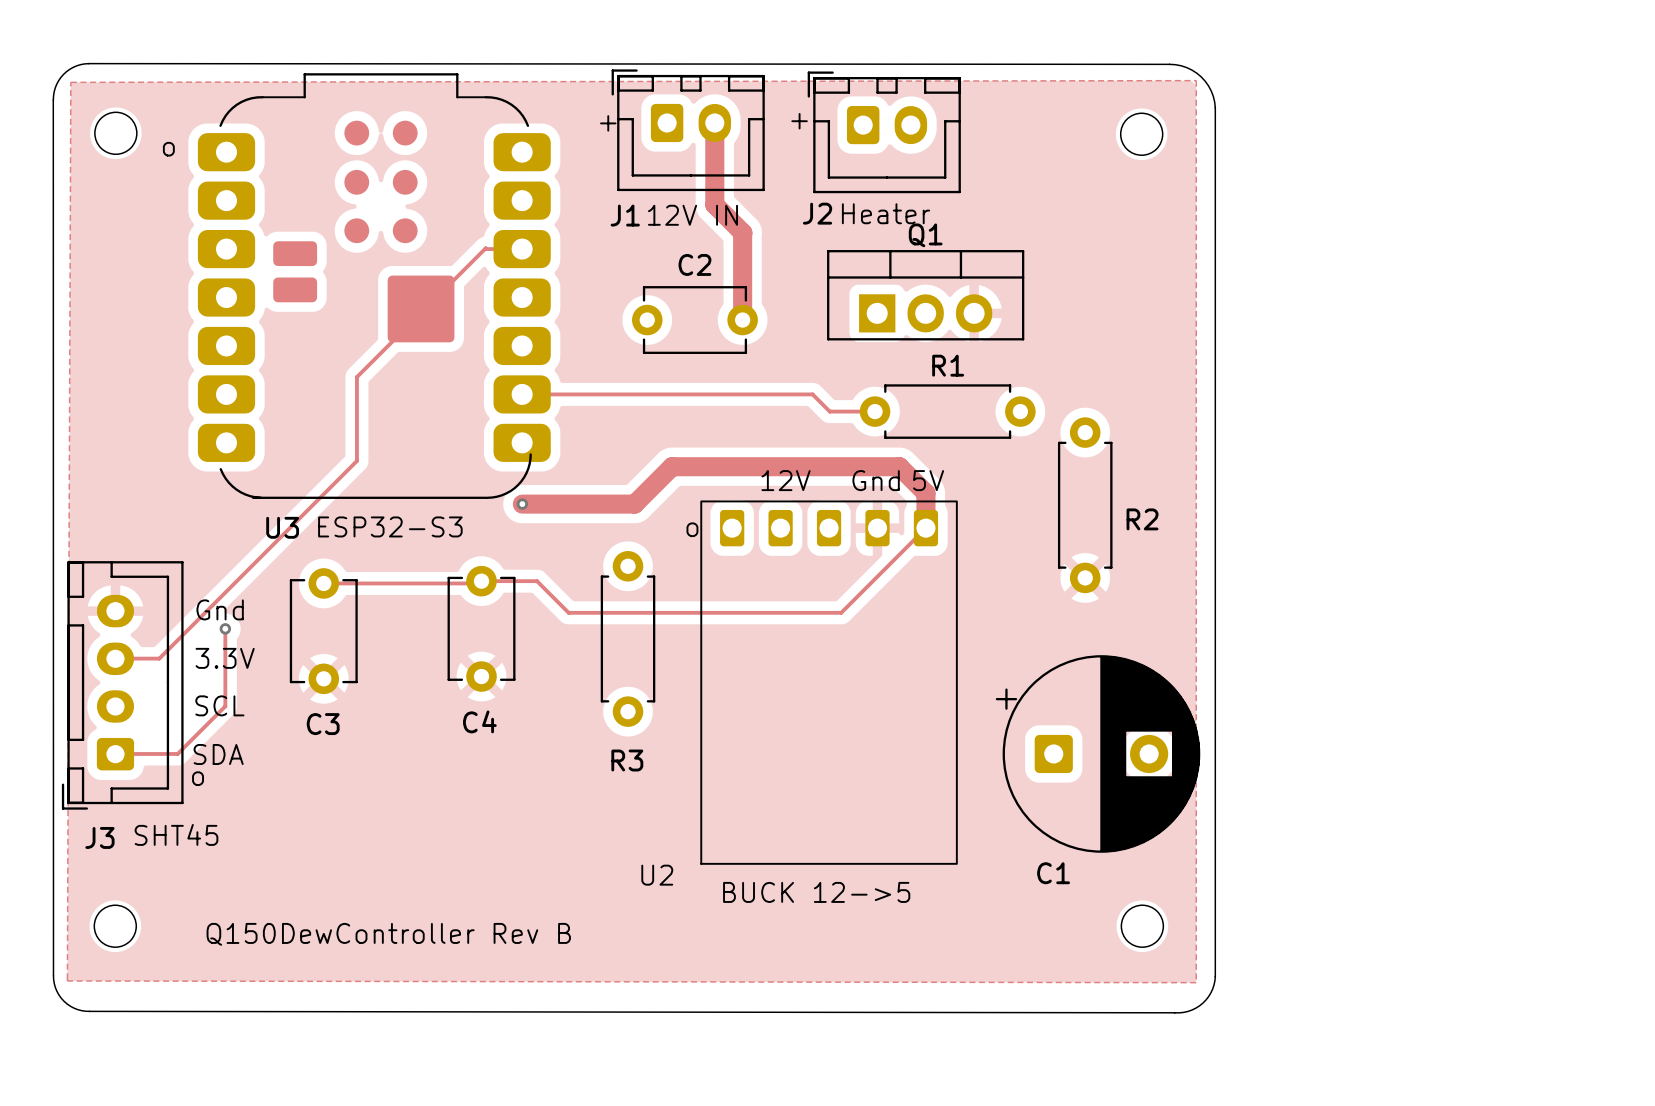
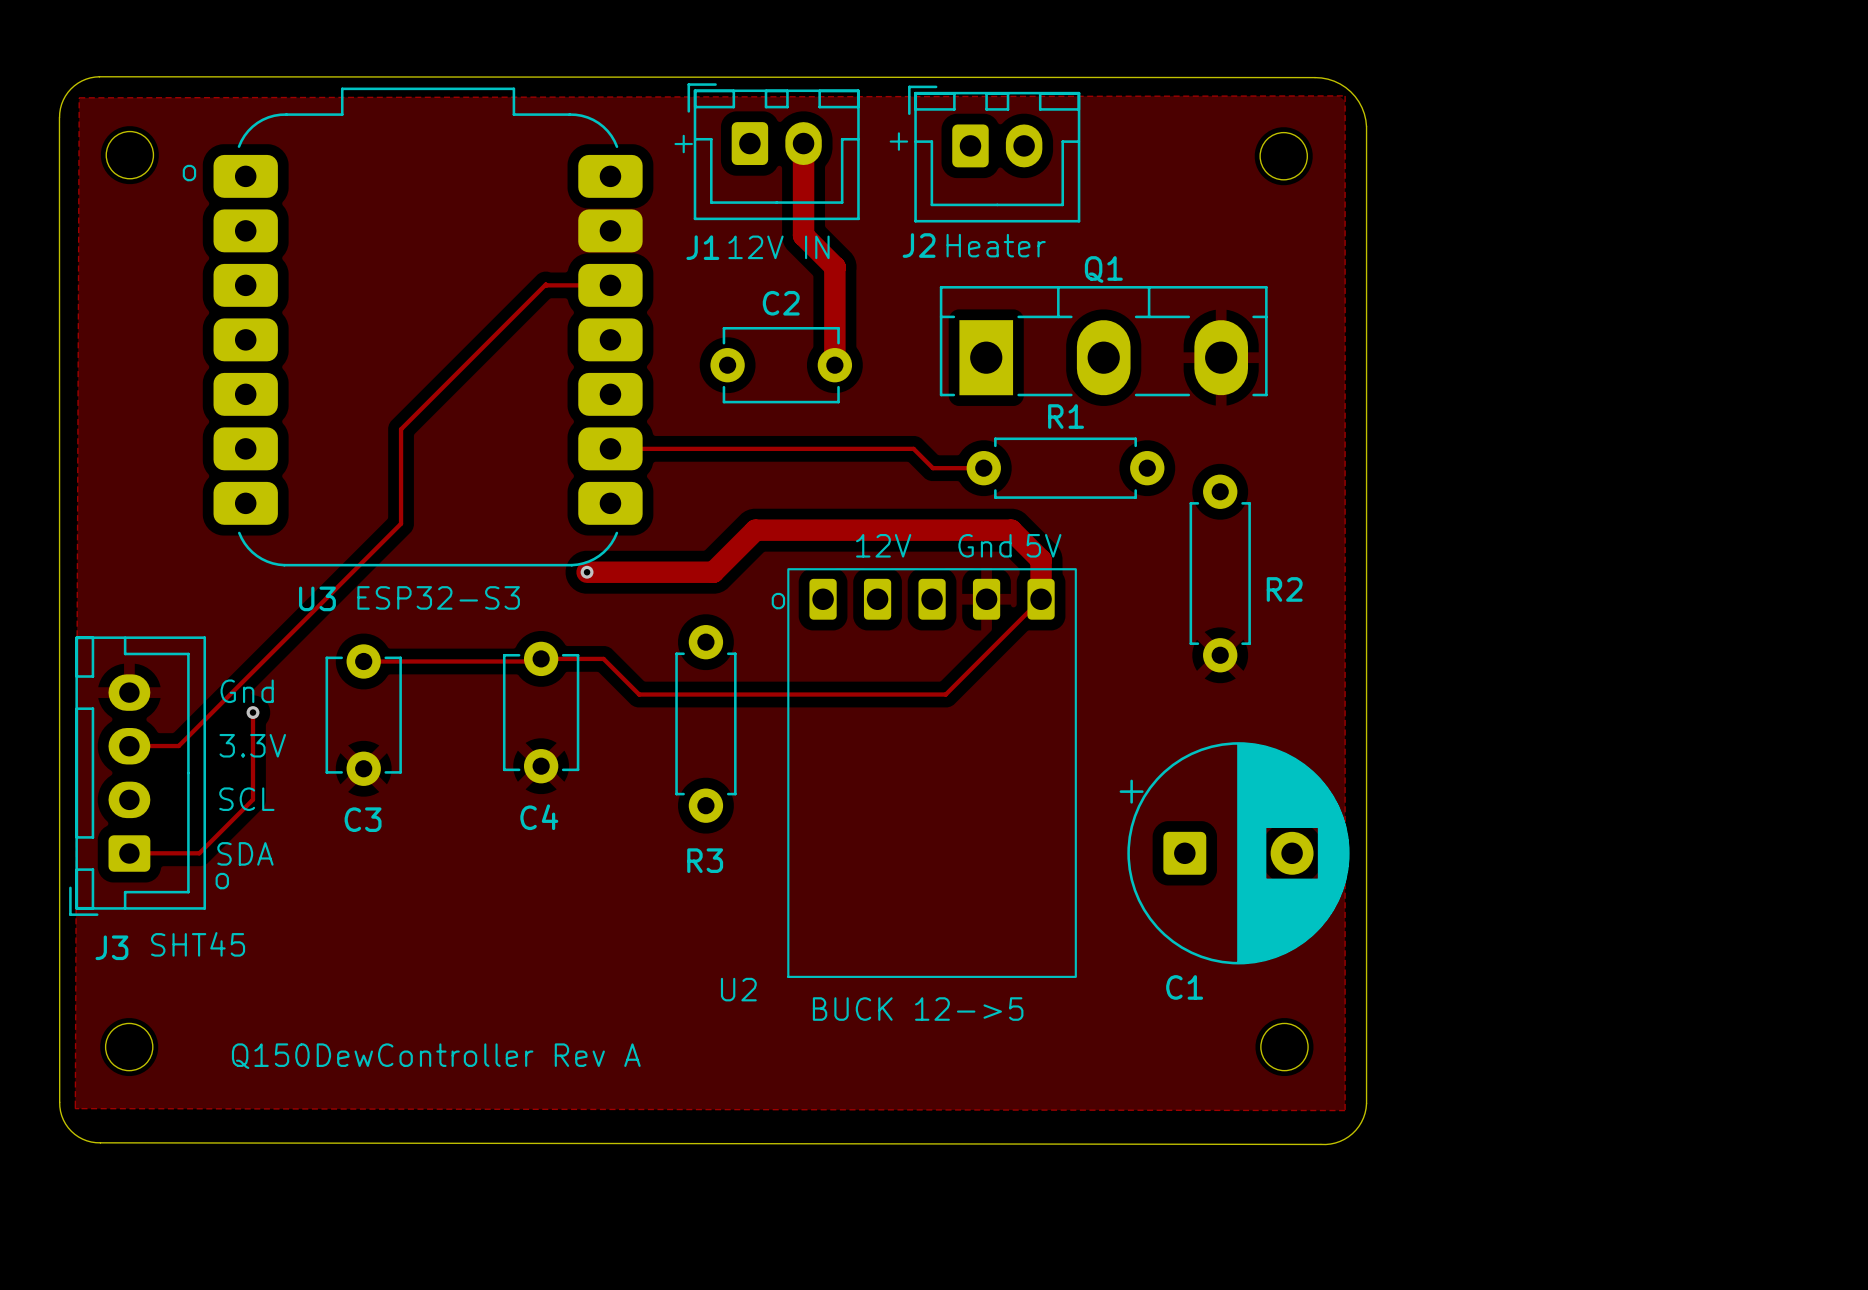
U3 footprint: [197, 73, 551, 499] -> [213, 87, 643, 567]
Q1 footprint: [827, 250, 1025, 341] -> [939, 286, 1268, 397]
text: Q150DewController Rev B (388, 934) -> Q150DewController Rev A (436, 1056)

